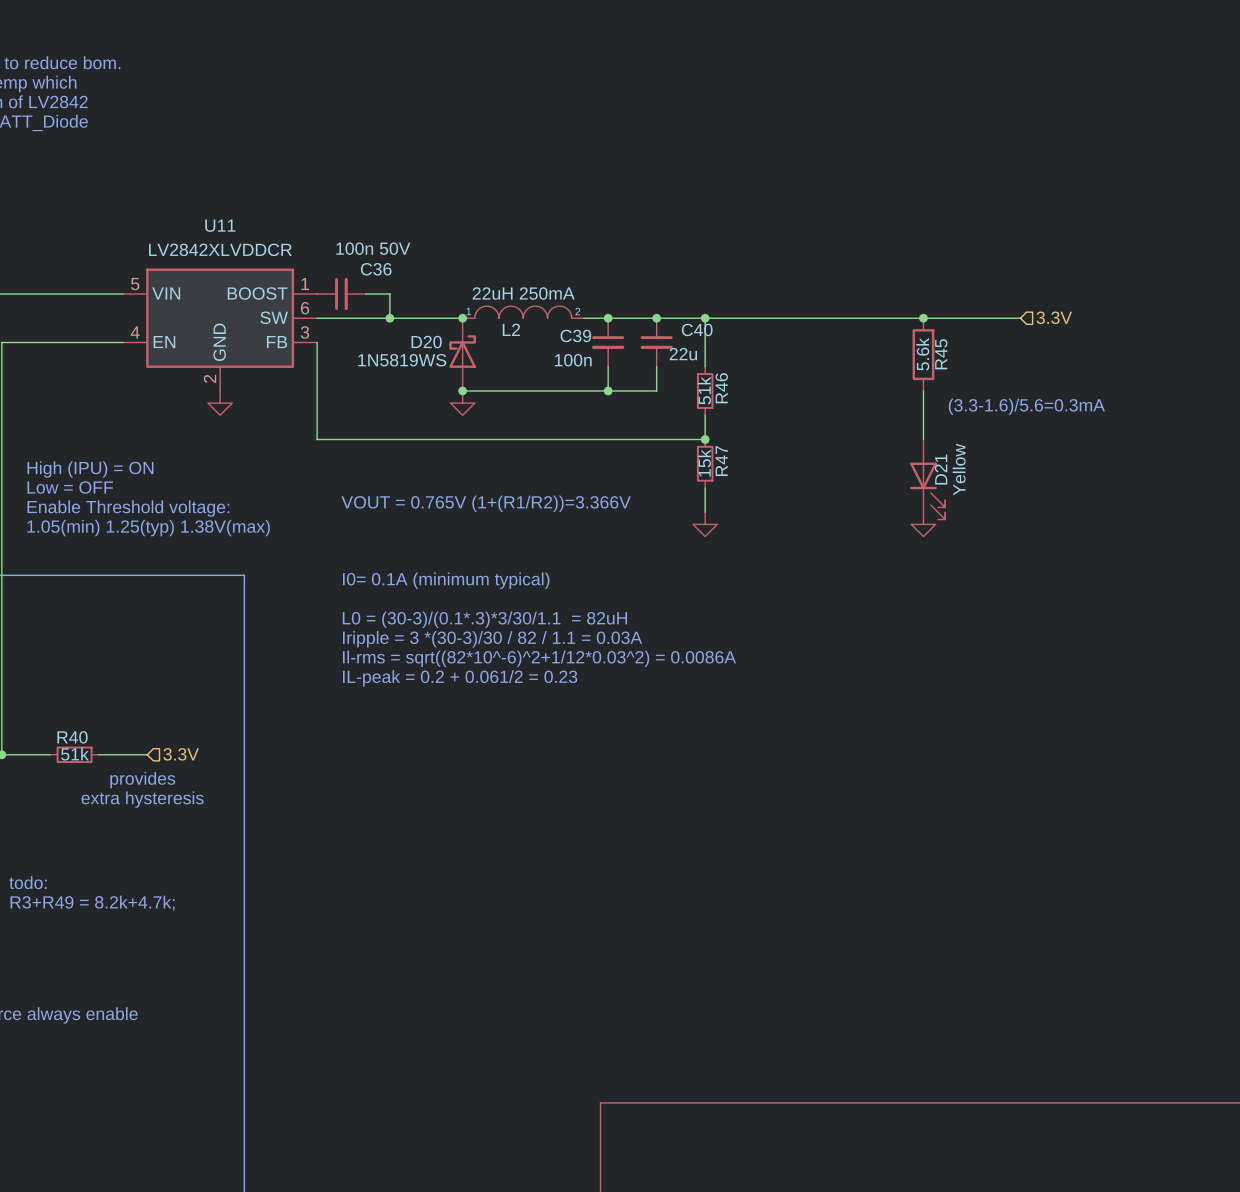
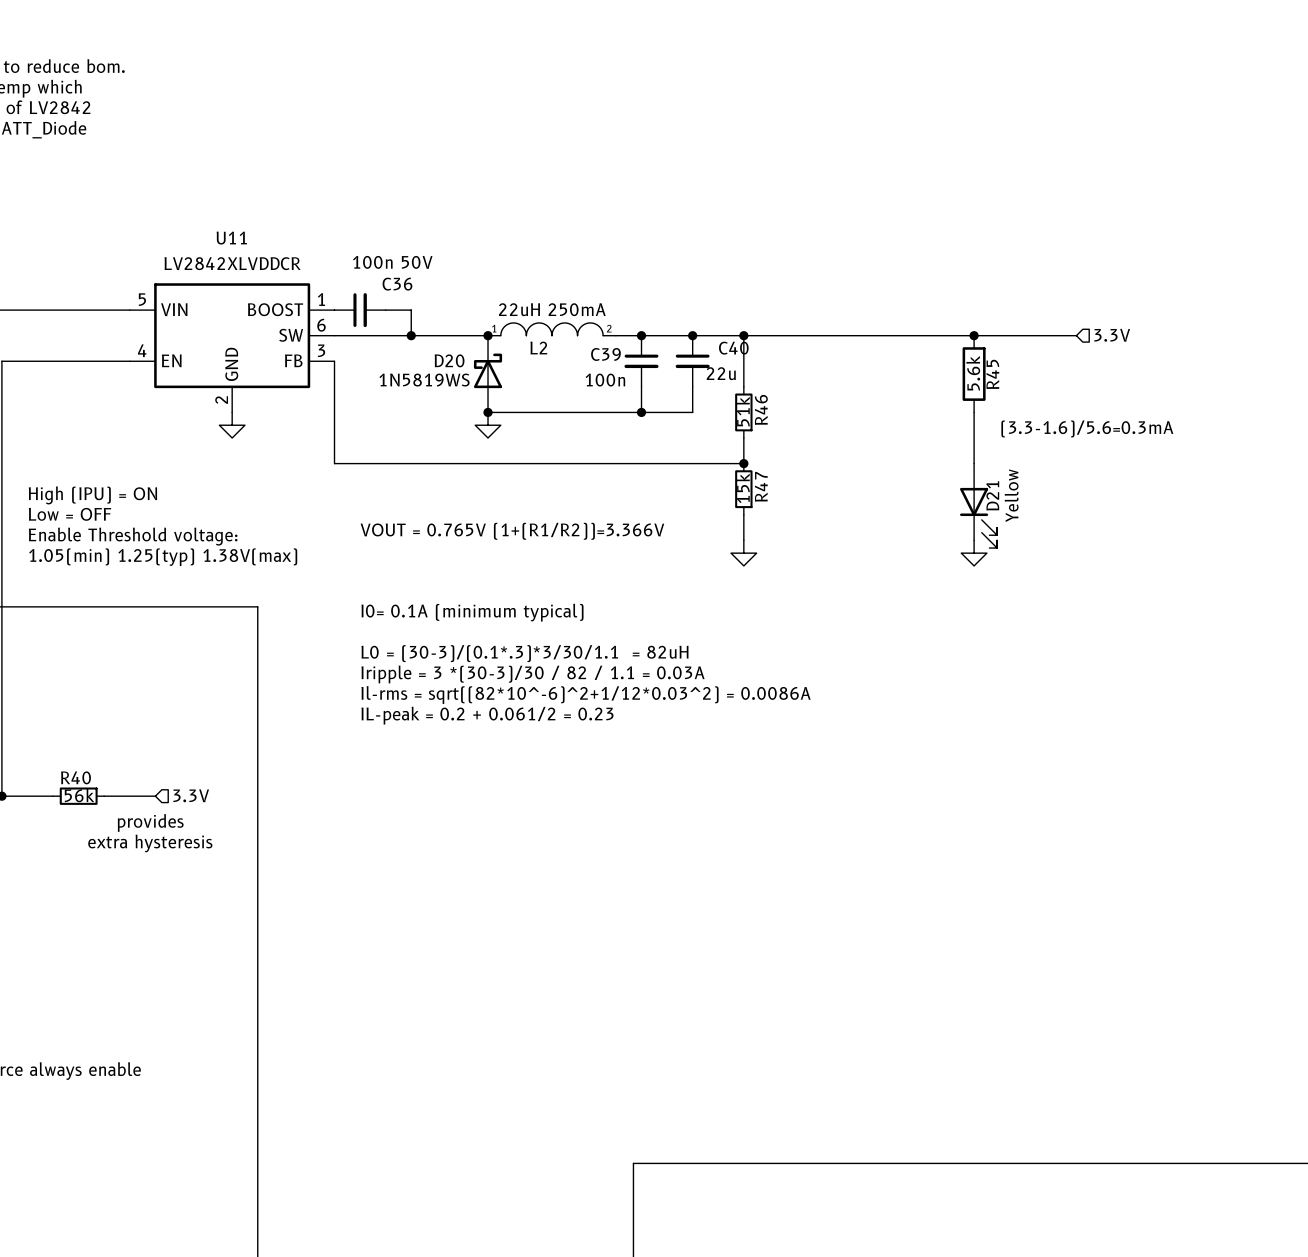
R40 value: 51k (74, 754) -> 56k (79, 795)
text: todo: (28, 882) -> none
text: R3+R49 = 8.2k+4.7k; (92, 903) -> none

